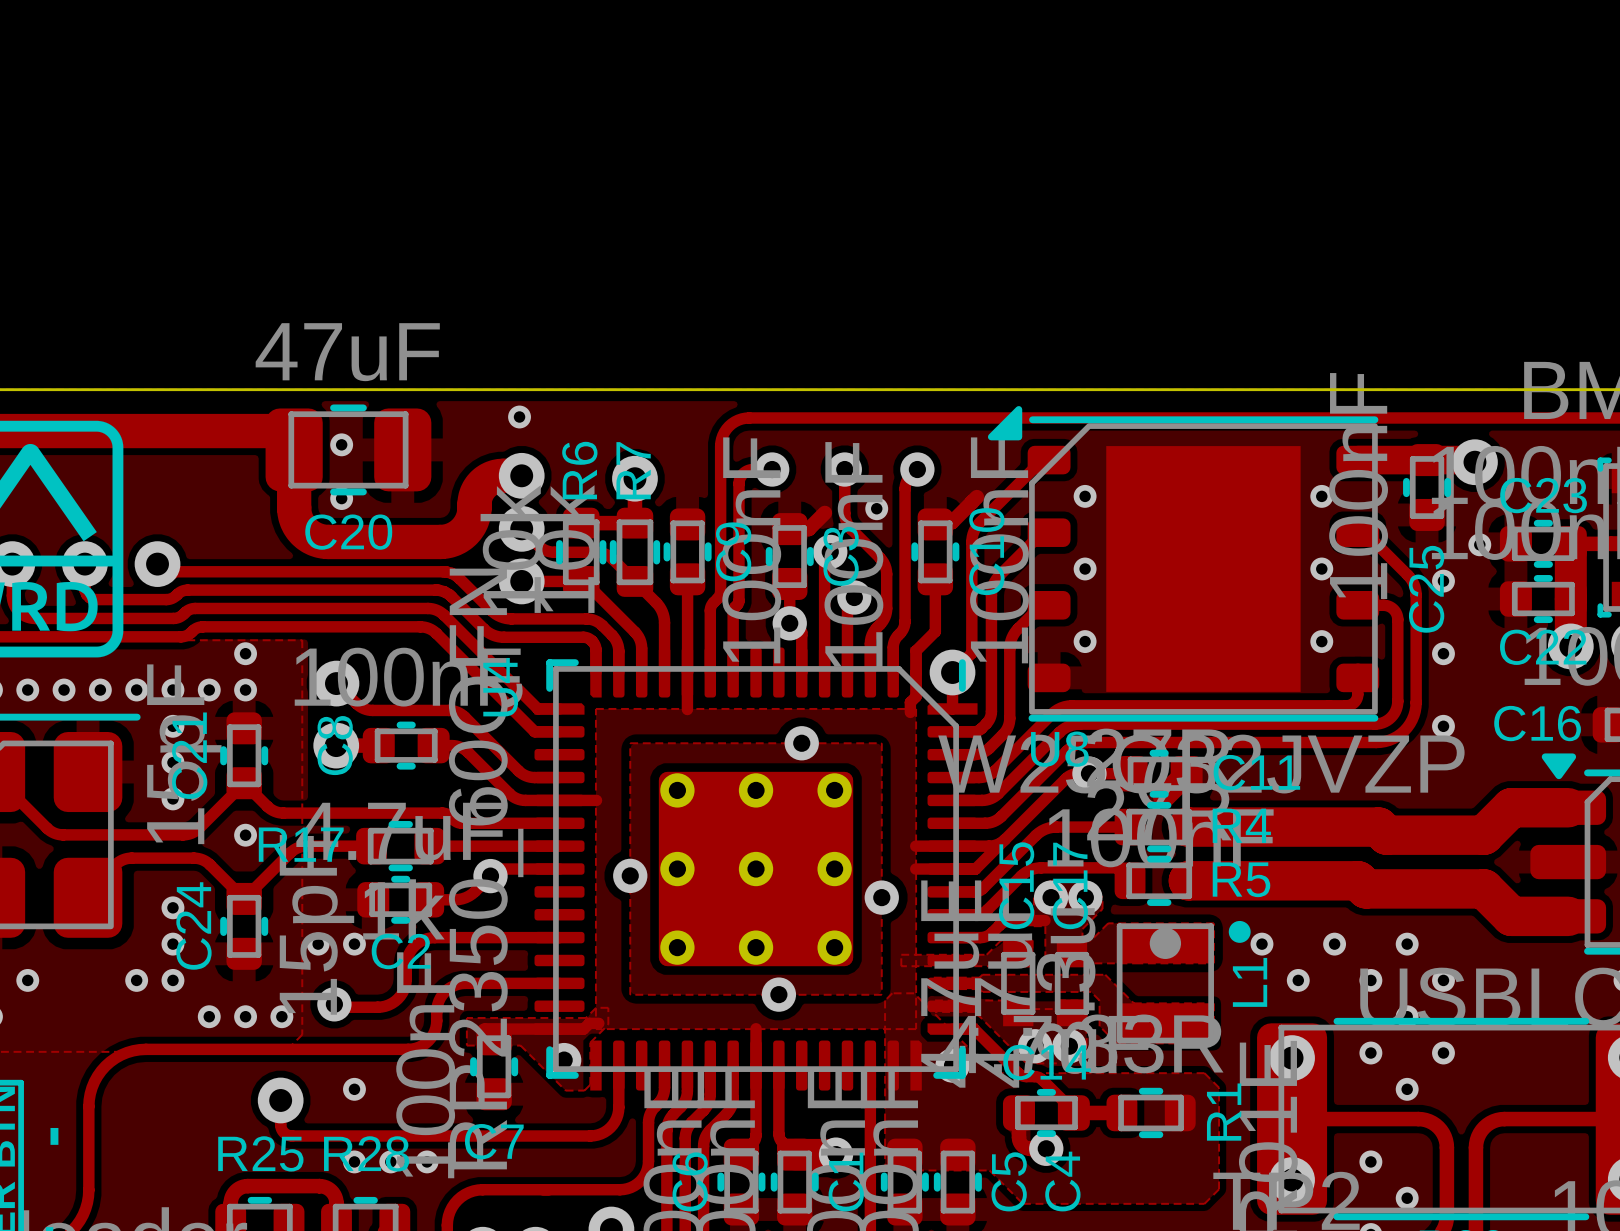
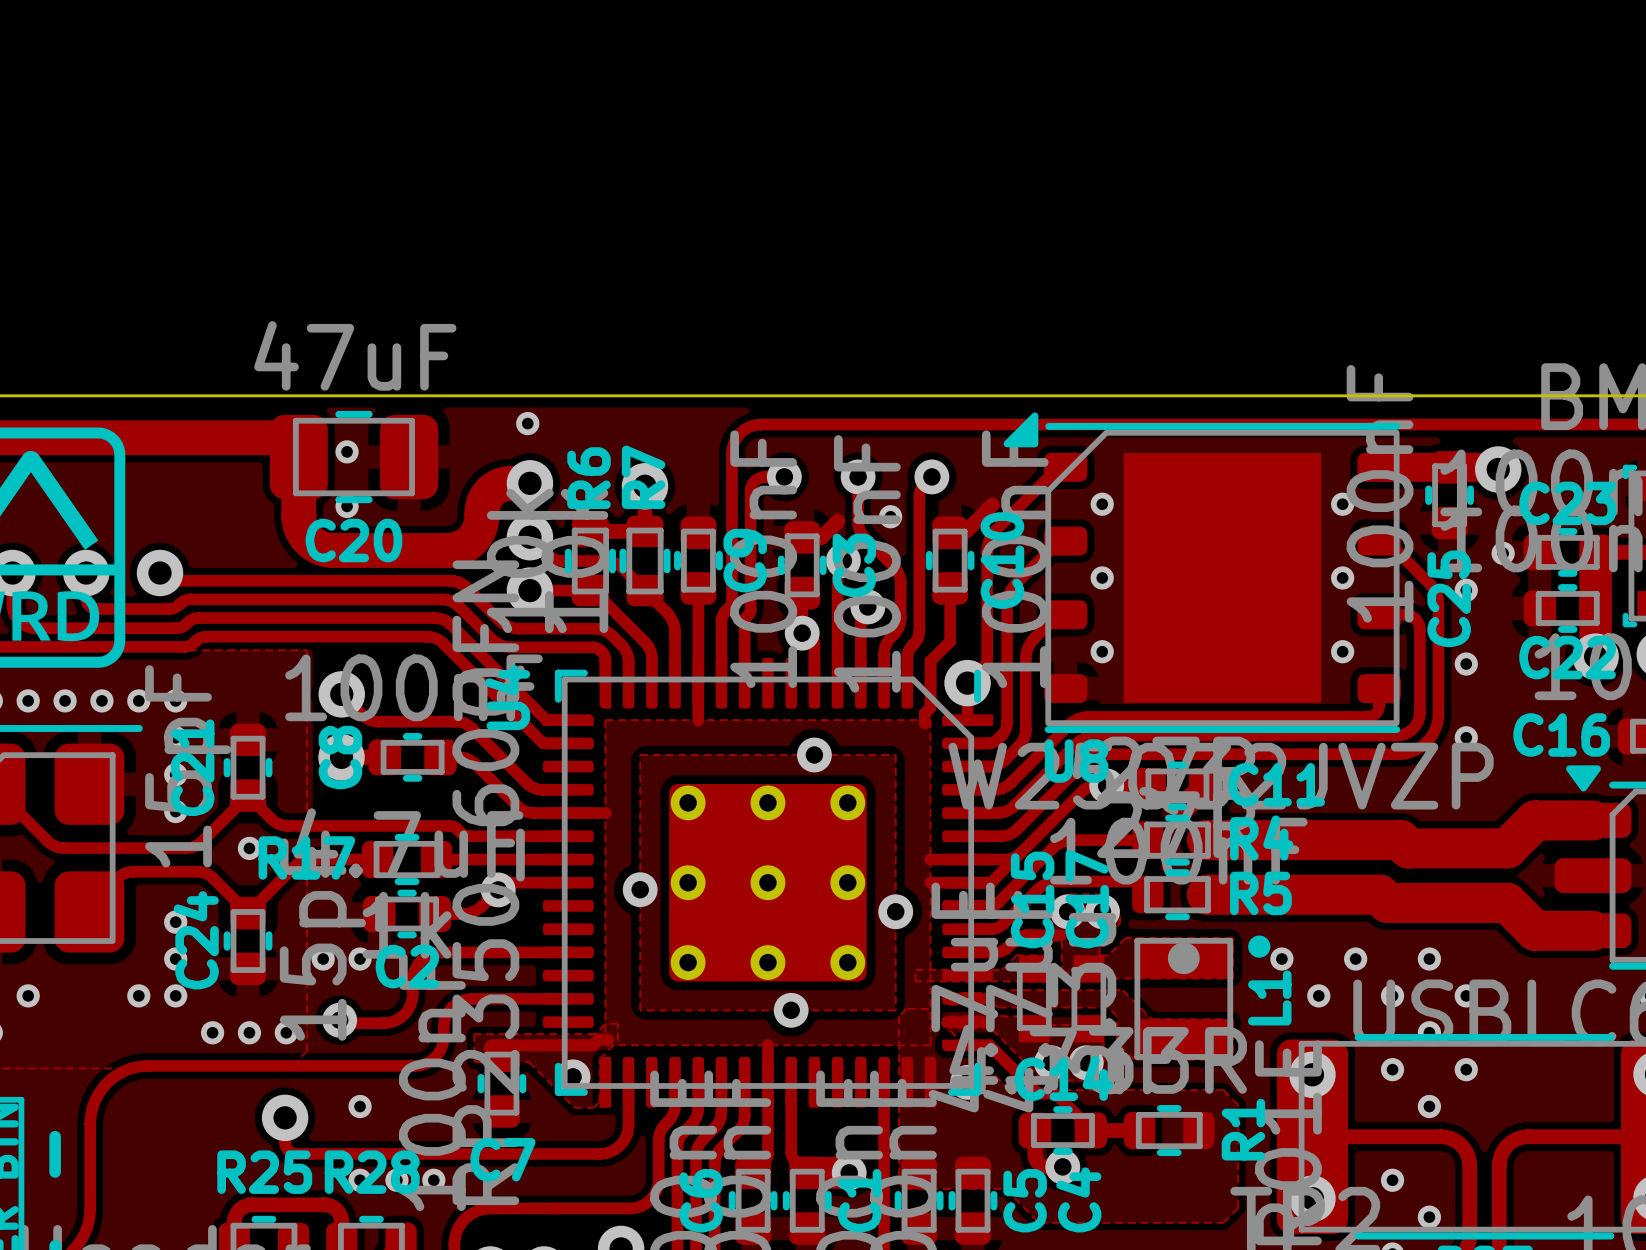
via: (245, 653) -> none
via: (209, 690) -> none
via: (245, 690) -> none

